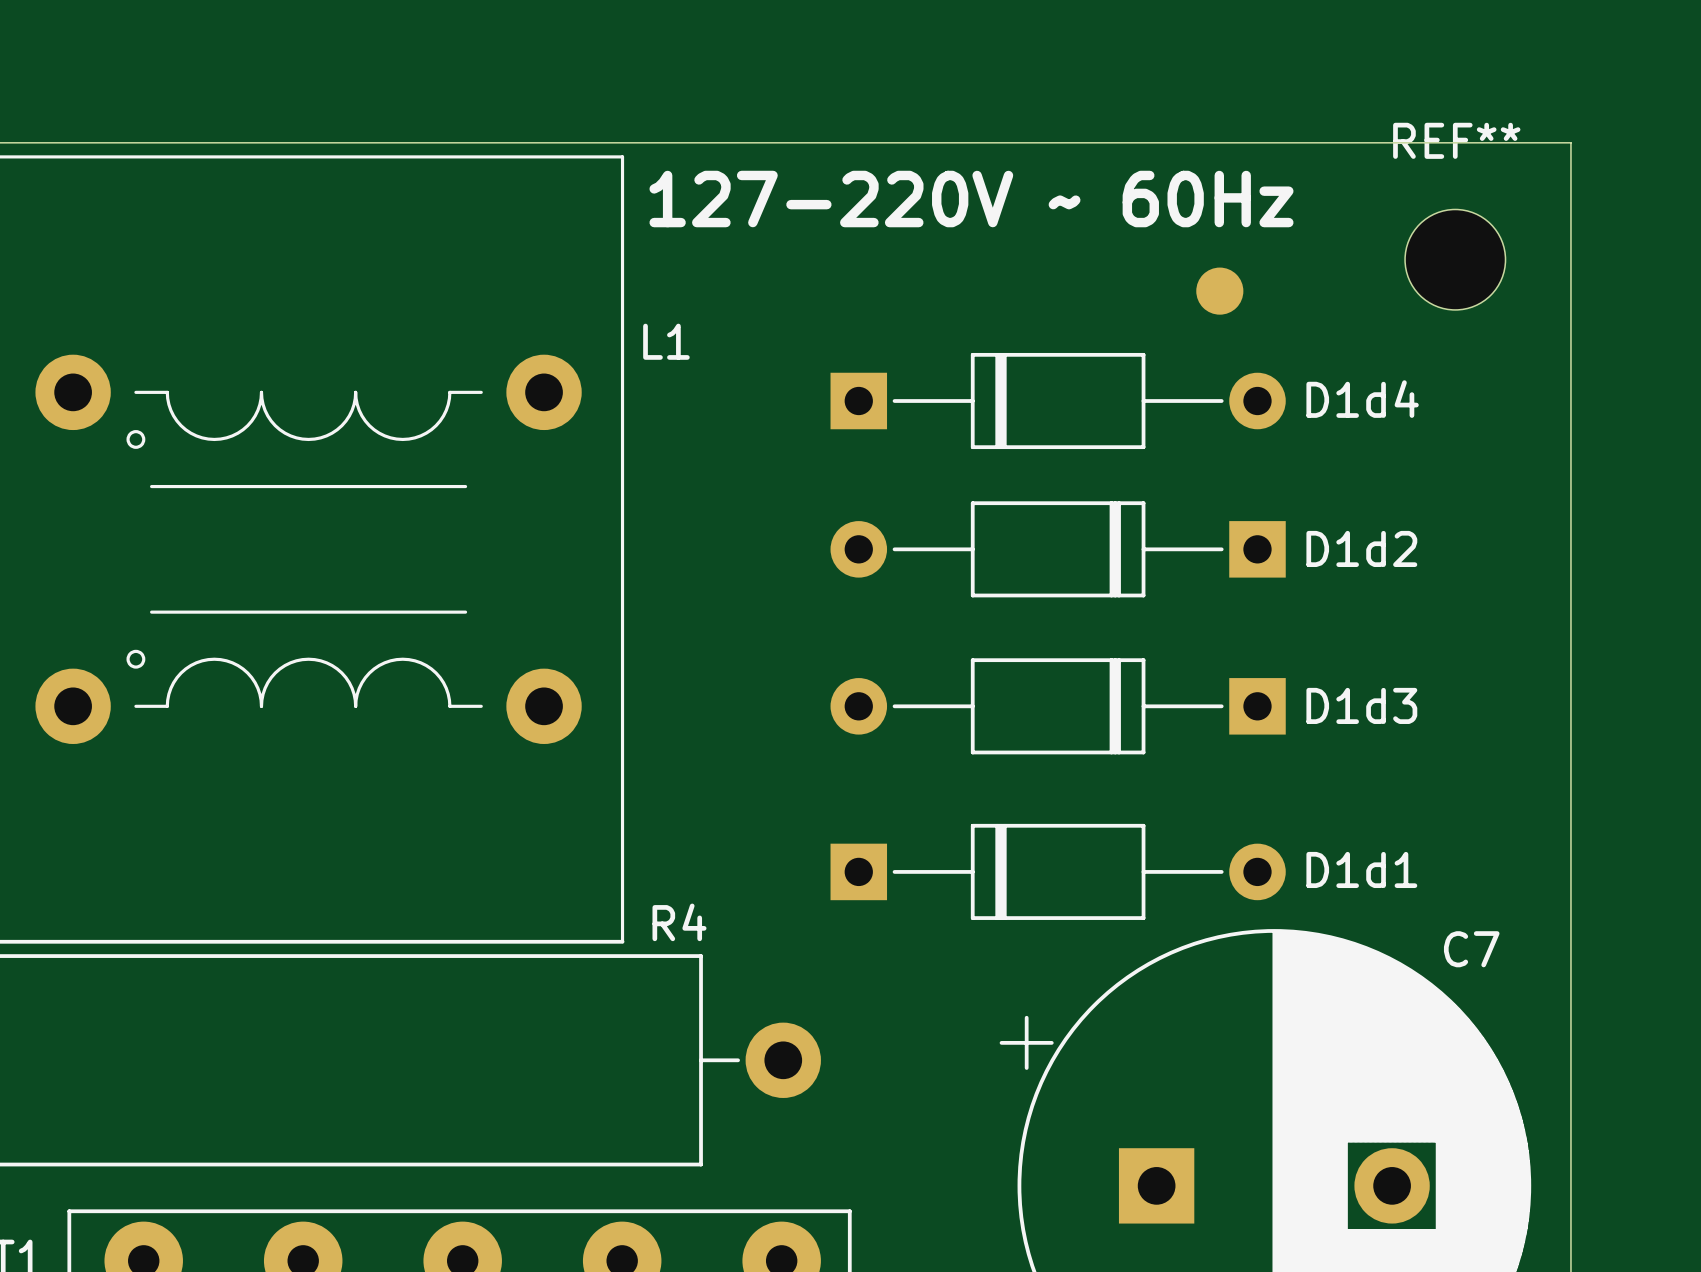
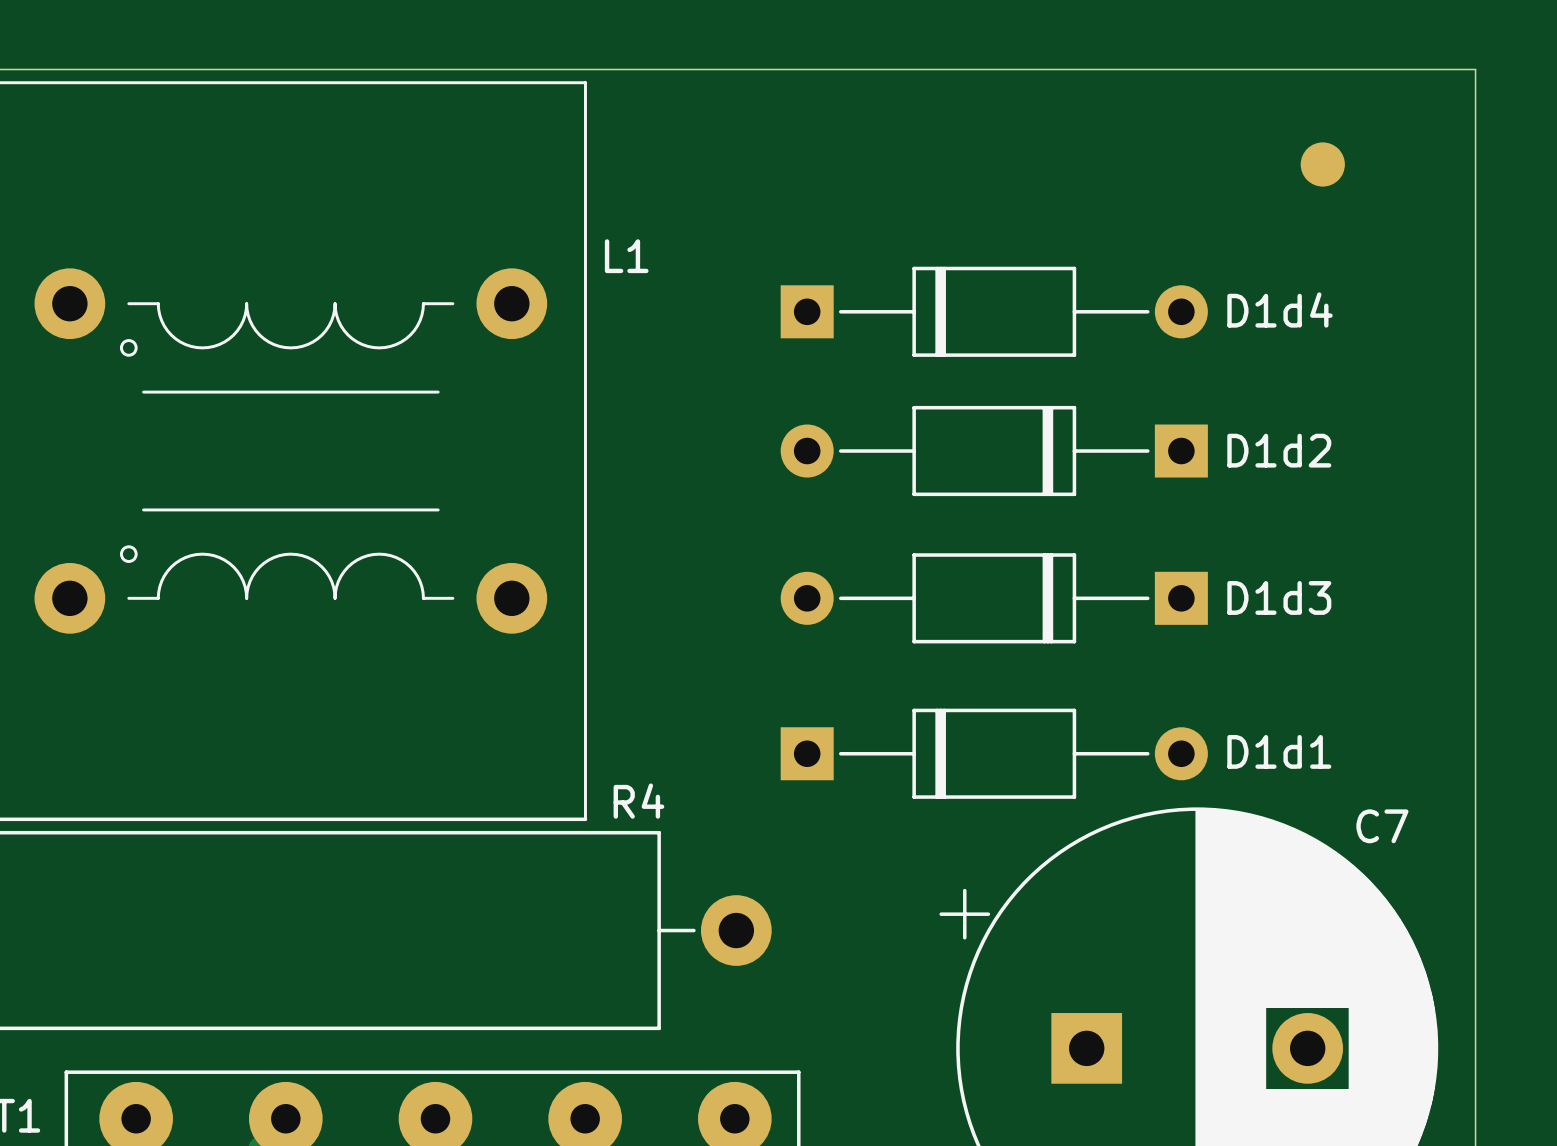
text: 127-220V ~ 60Hz (971, 199) -> none
REF**: (1455, 259) -> none
part position: (1219, 291) -> (1322, 164)

